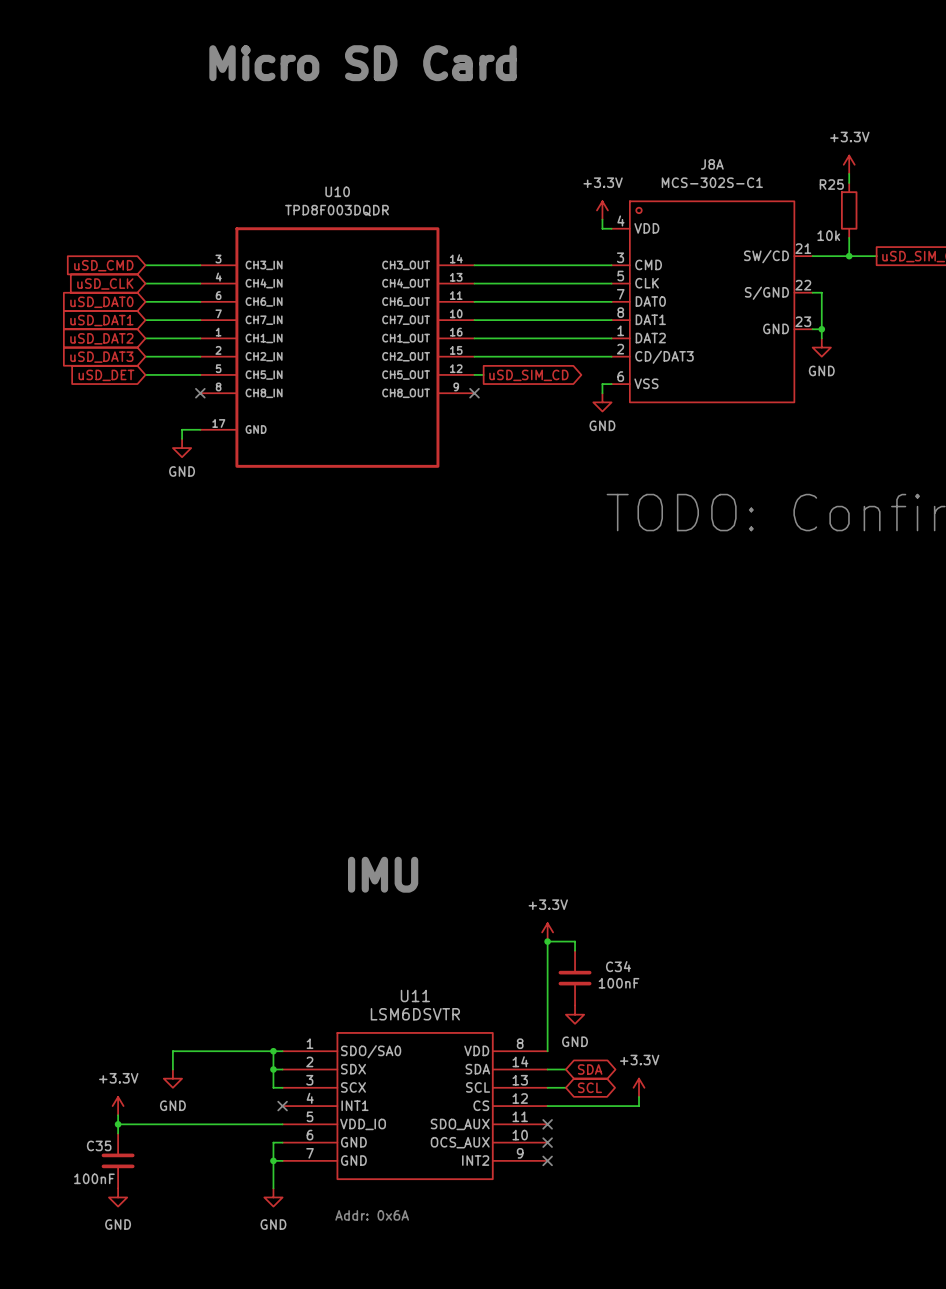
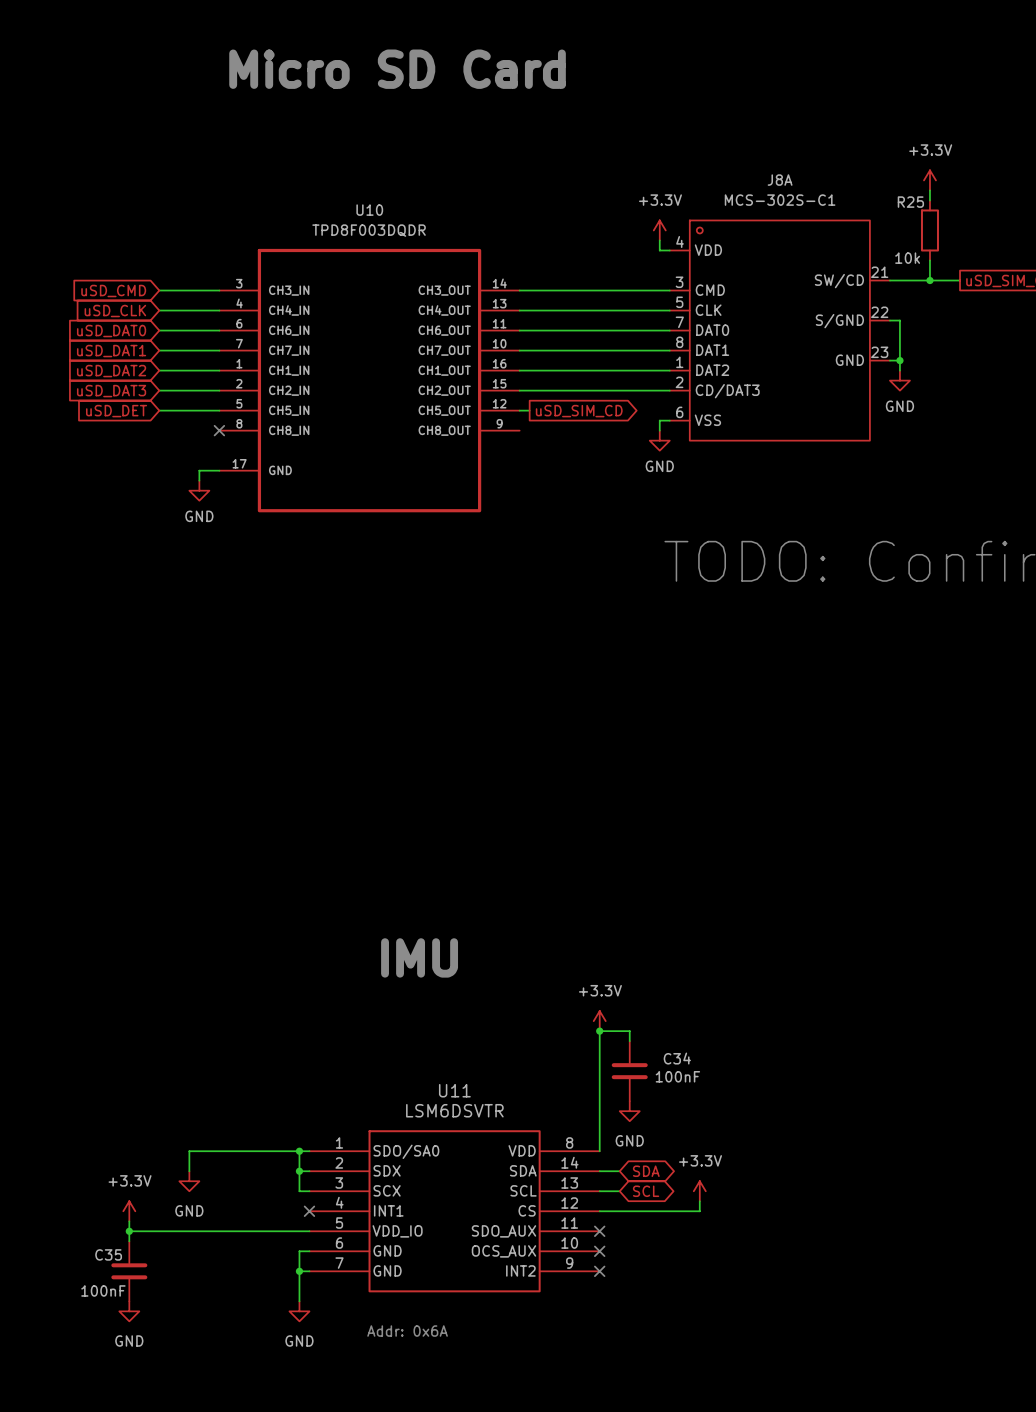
no-connect mark: (474, 393) -> none

